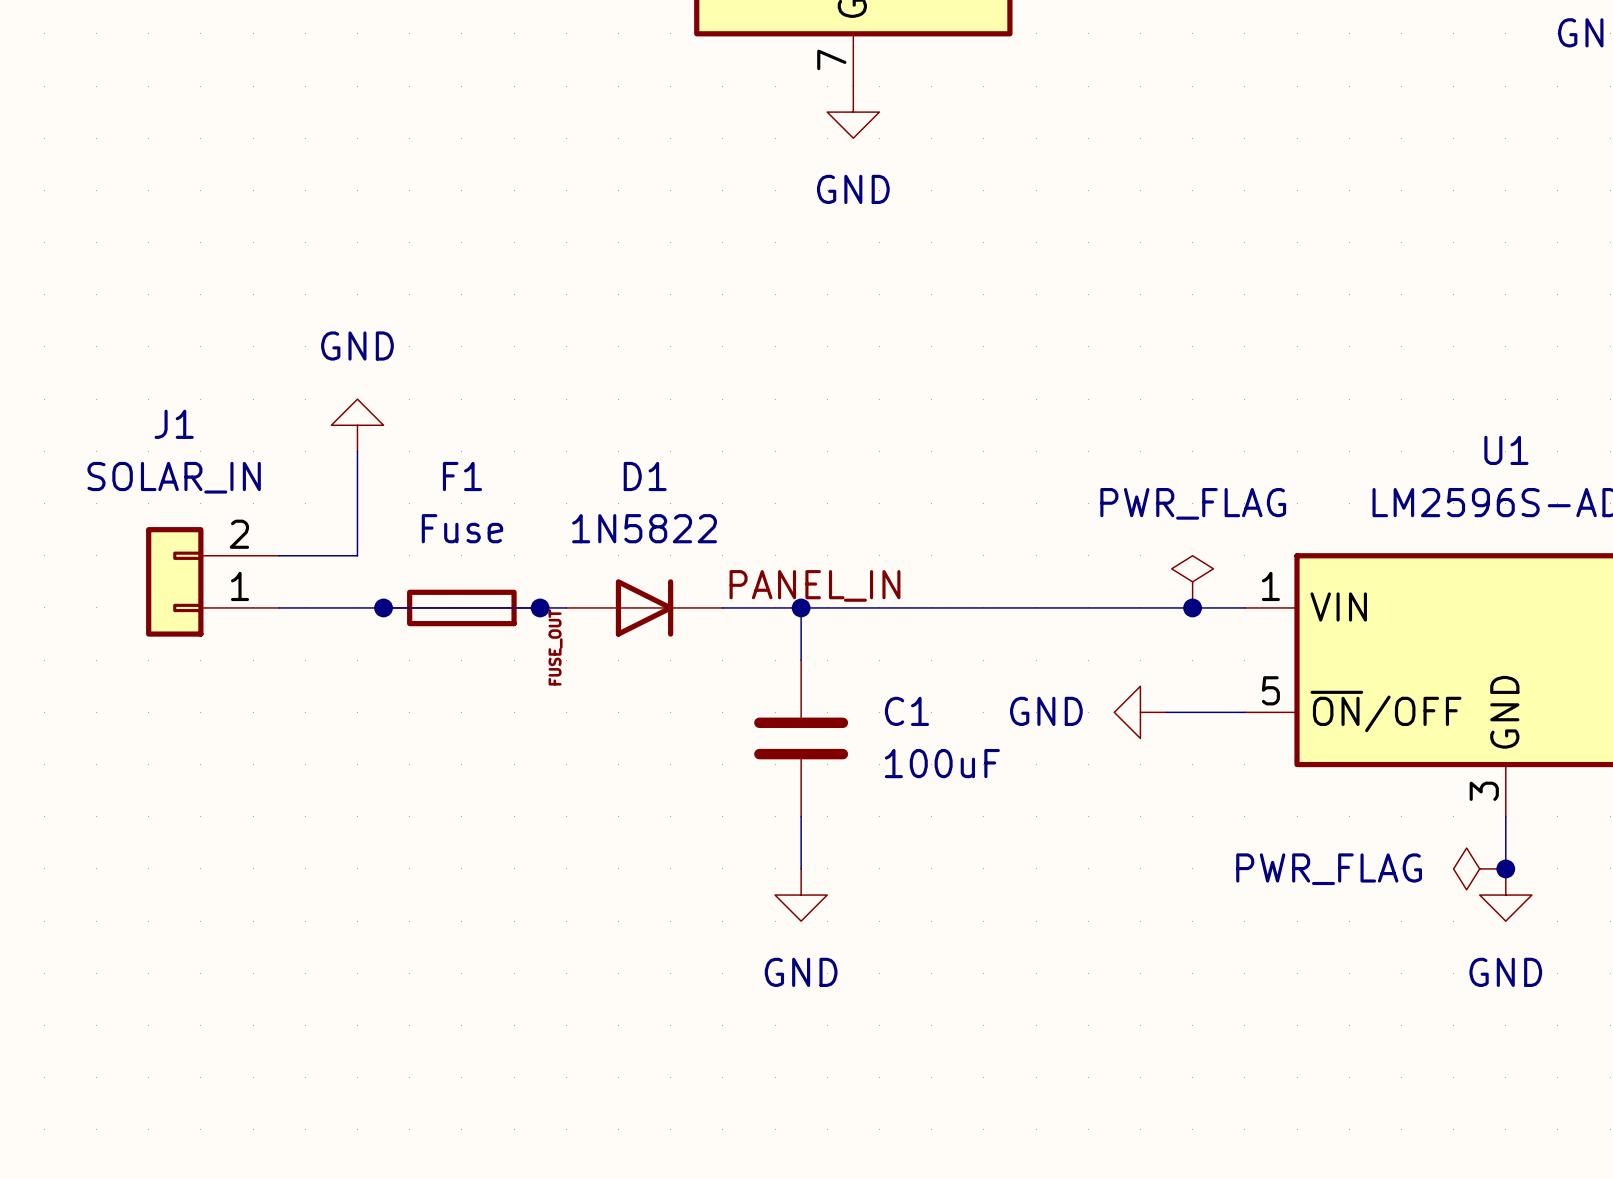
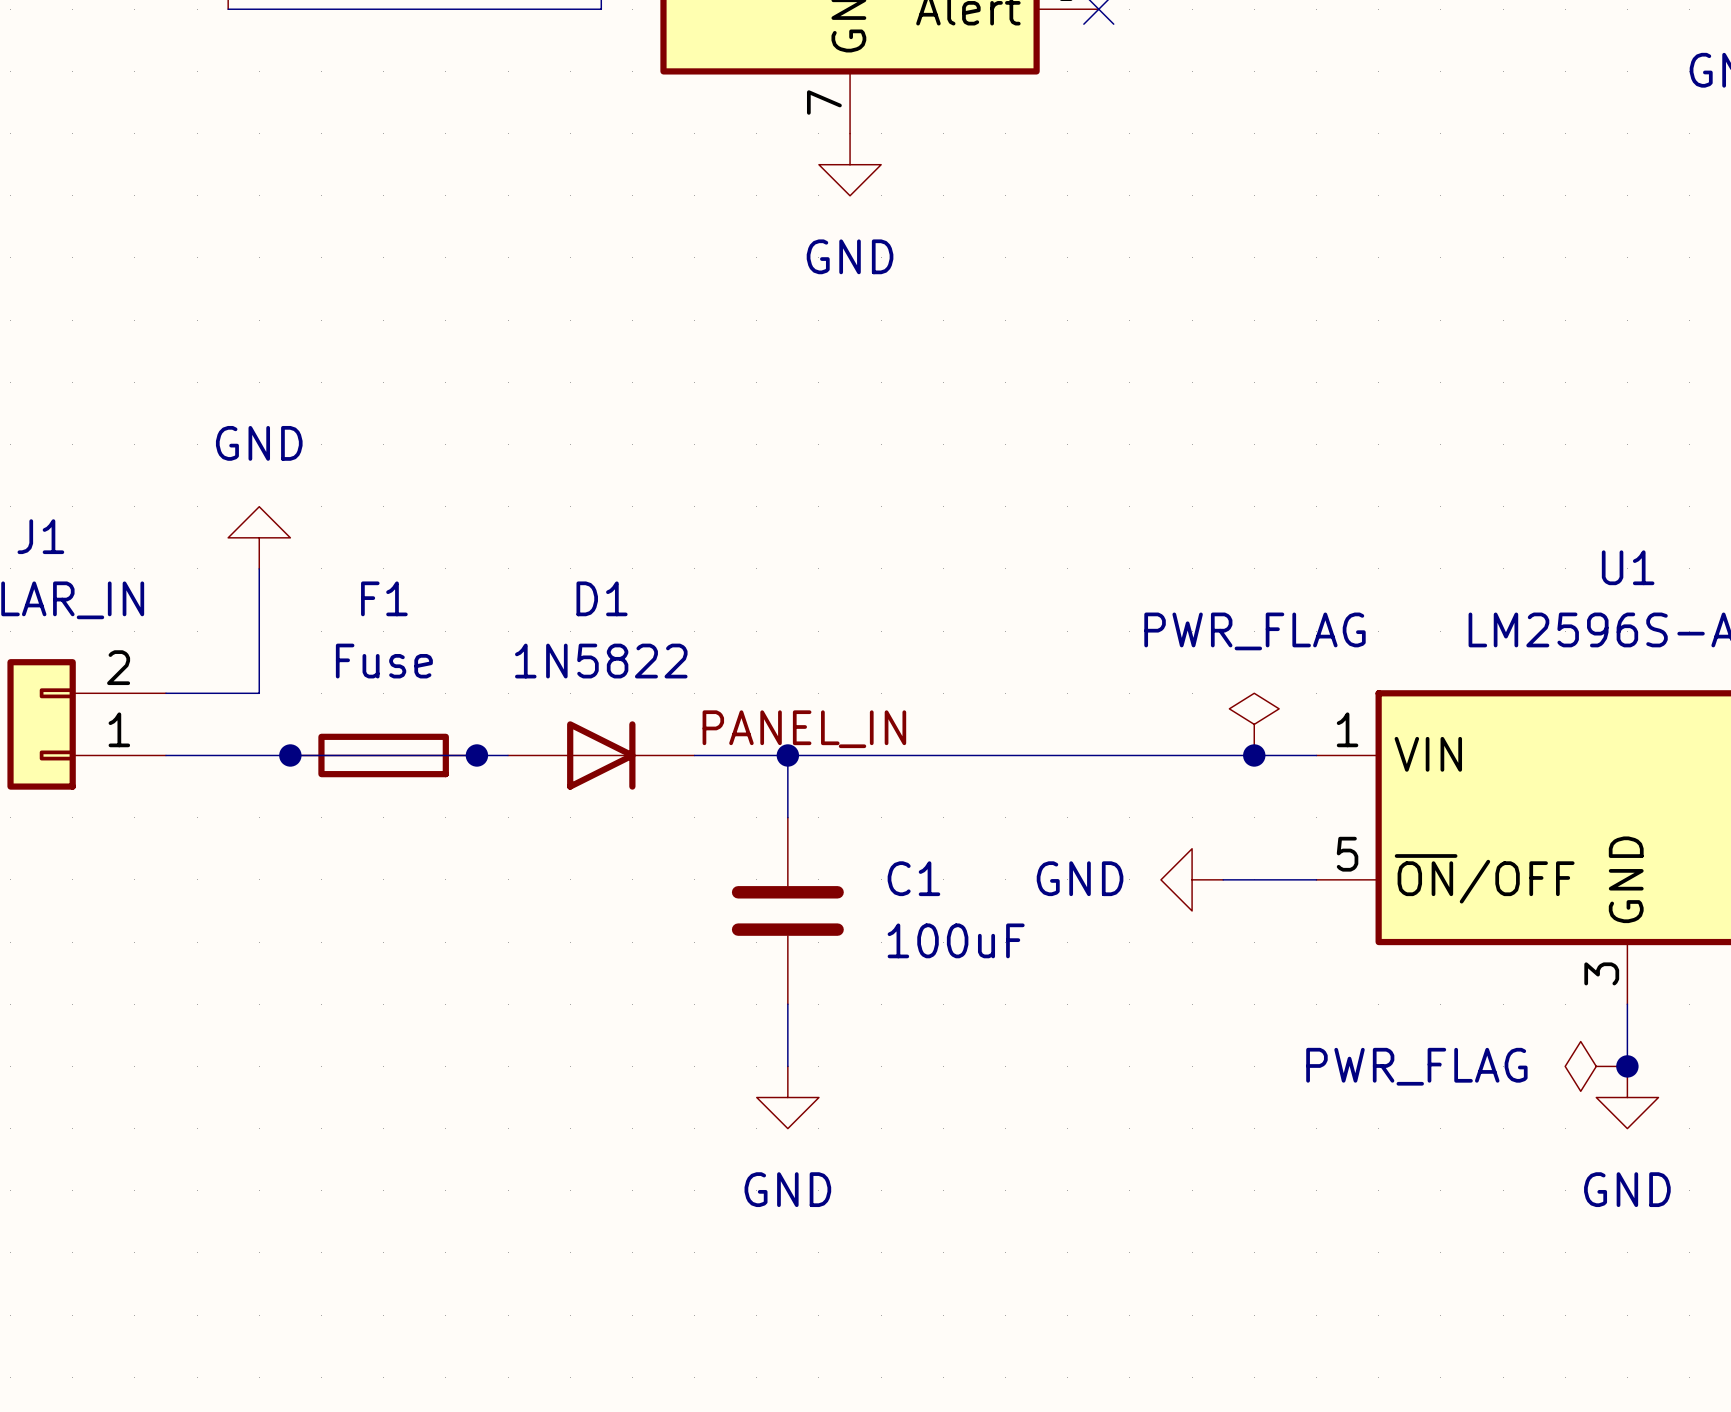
label: FUSE_OUT (555, 647) -> none

